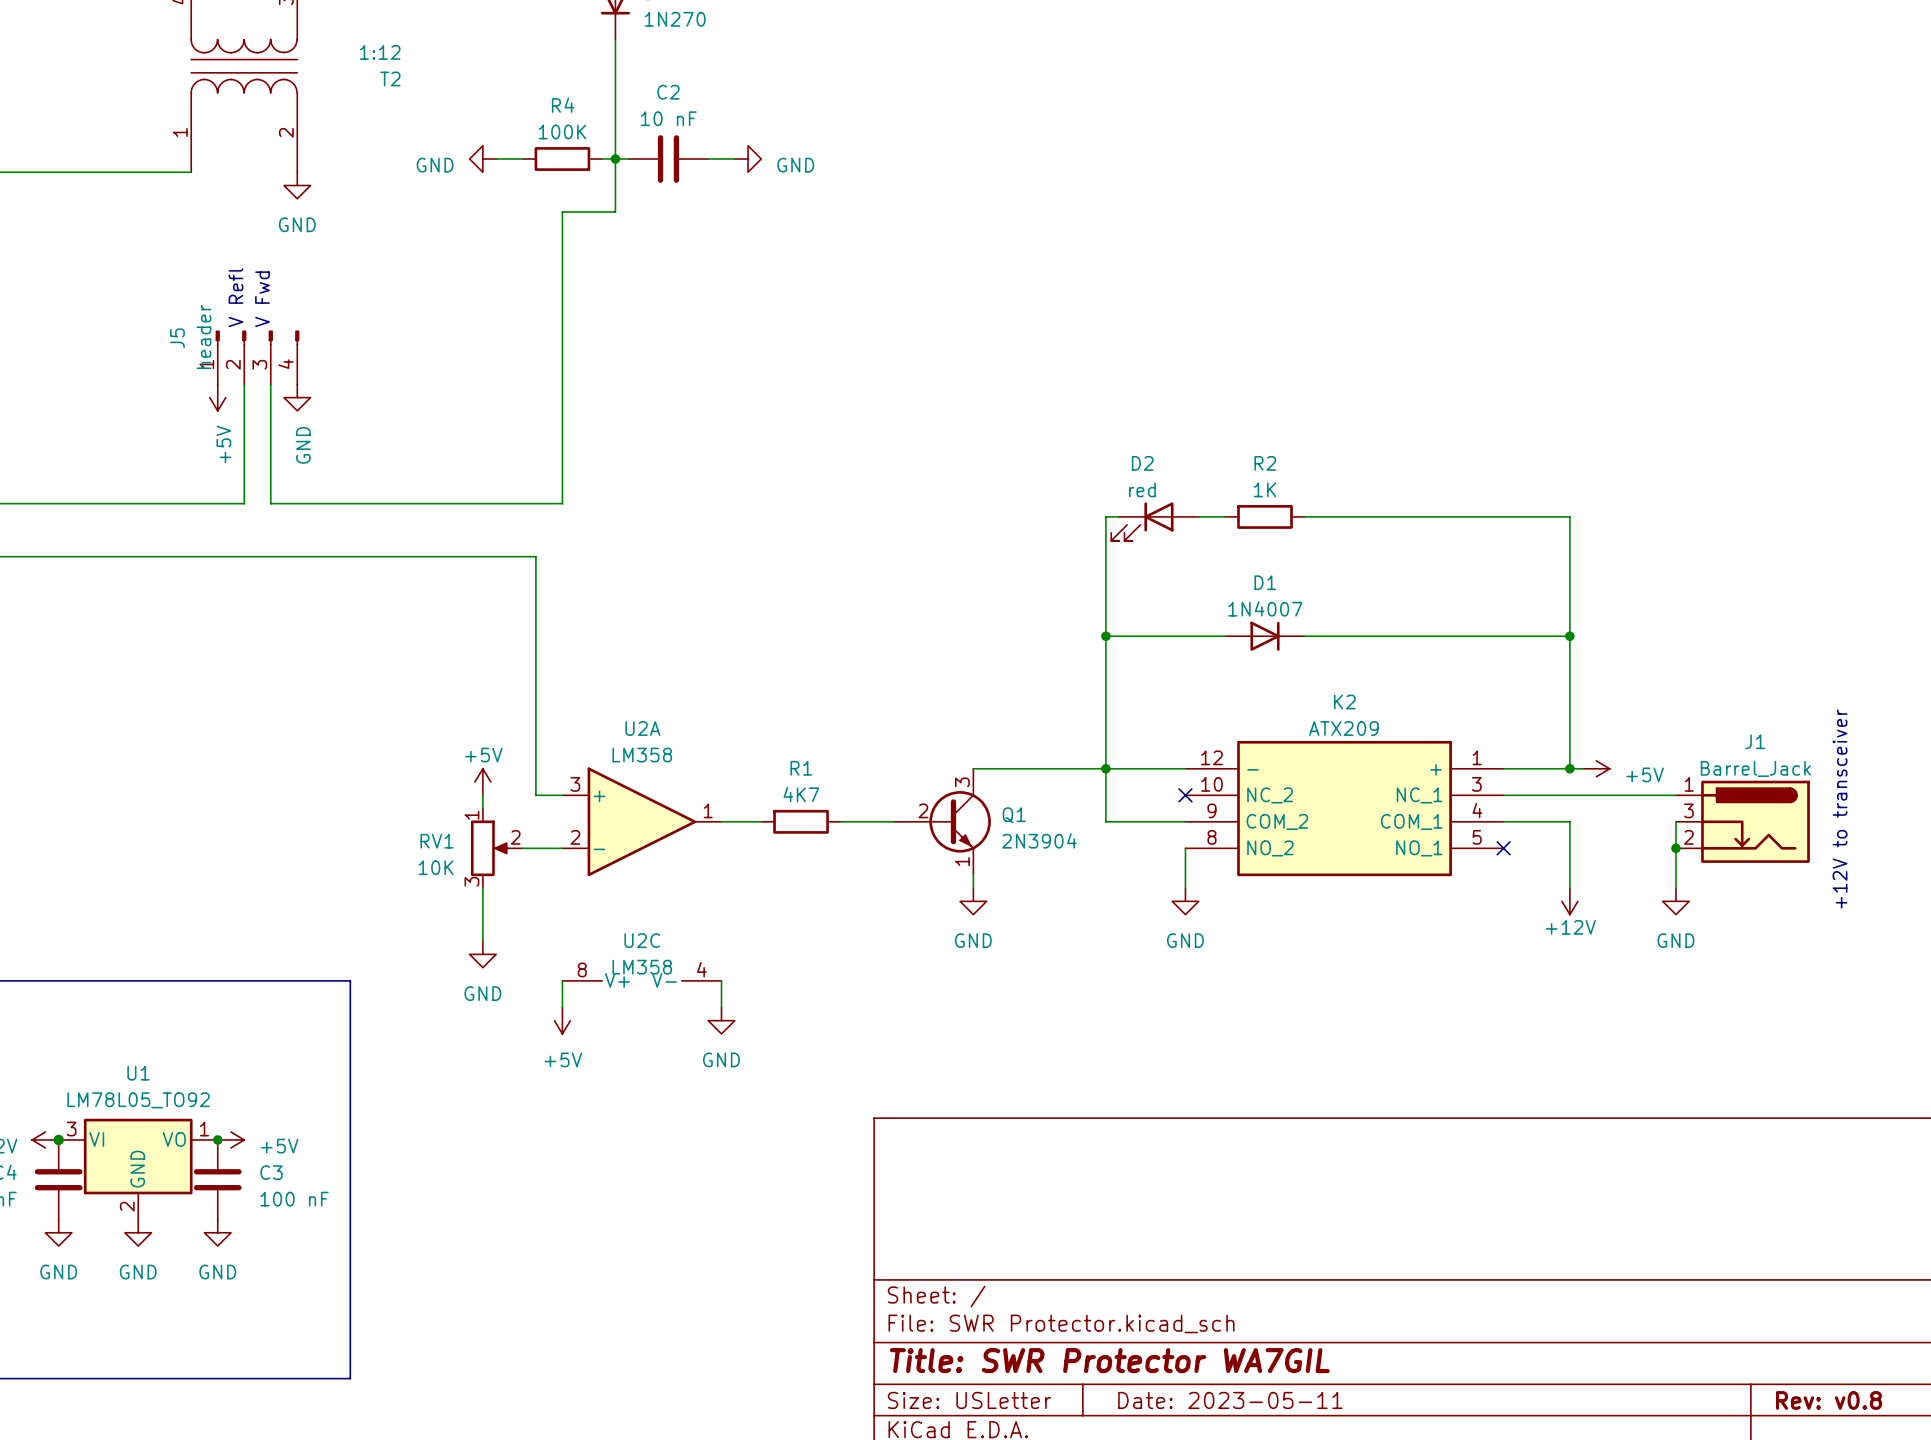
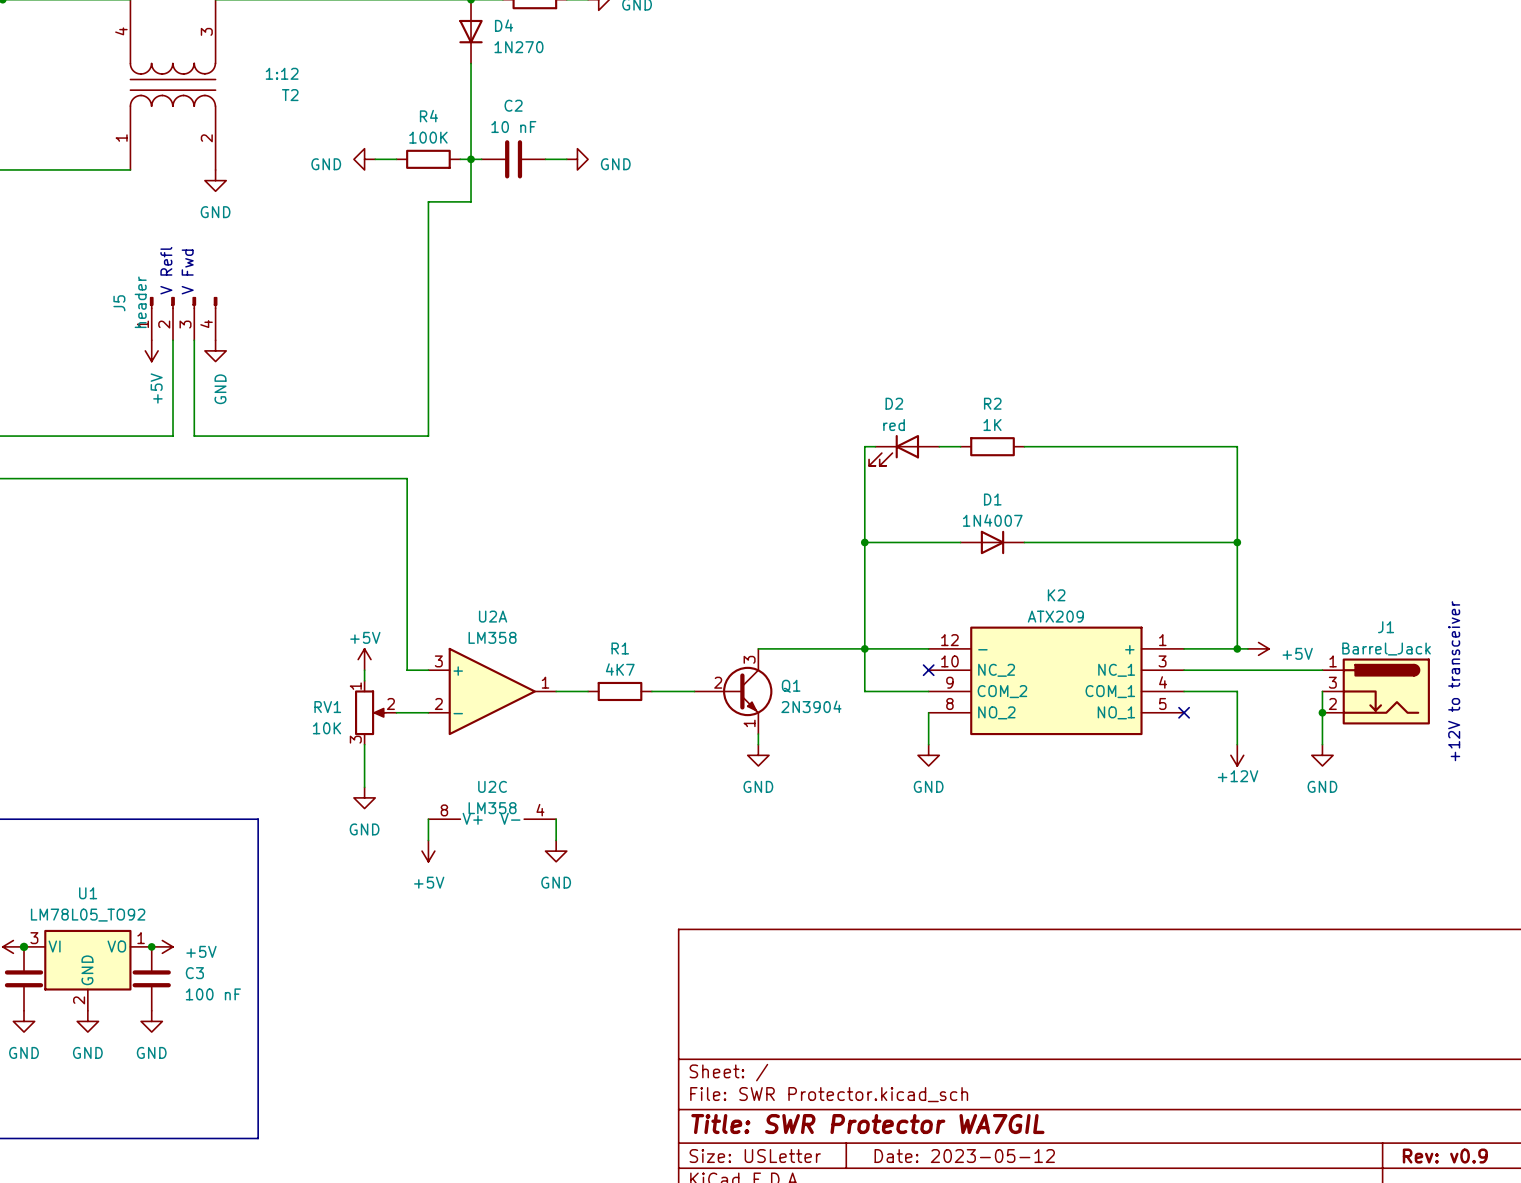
title block: Date: 2023-05-11 (1230, 1400) -> Date: 2023-05-12 (964, 1156)
title block: Rev: v0.8 (1829, 1400) -> Rev: v0.9 (1445, 1156)

